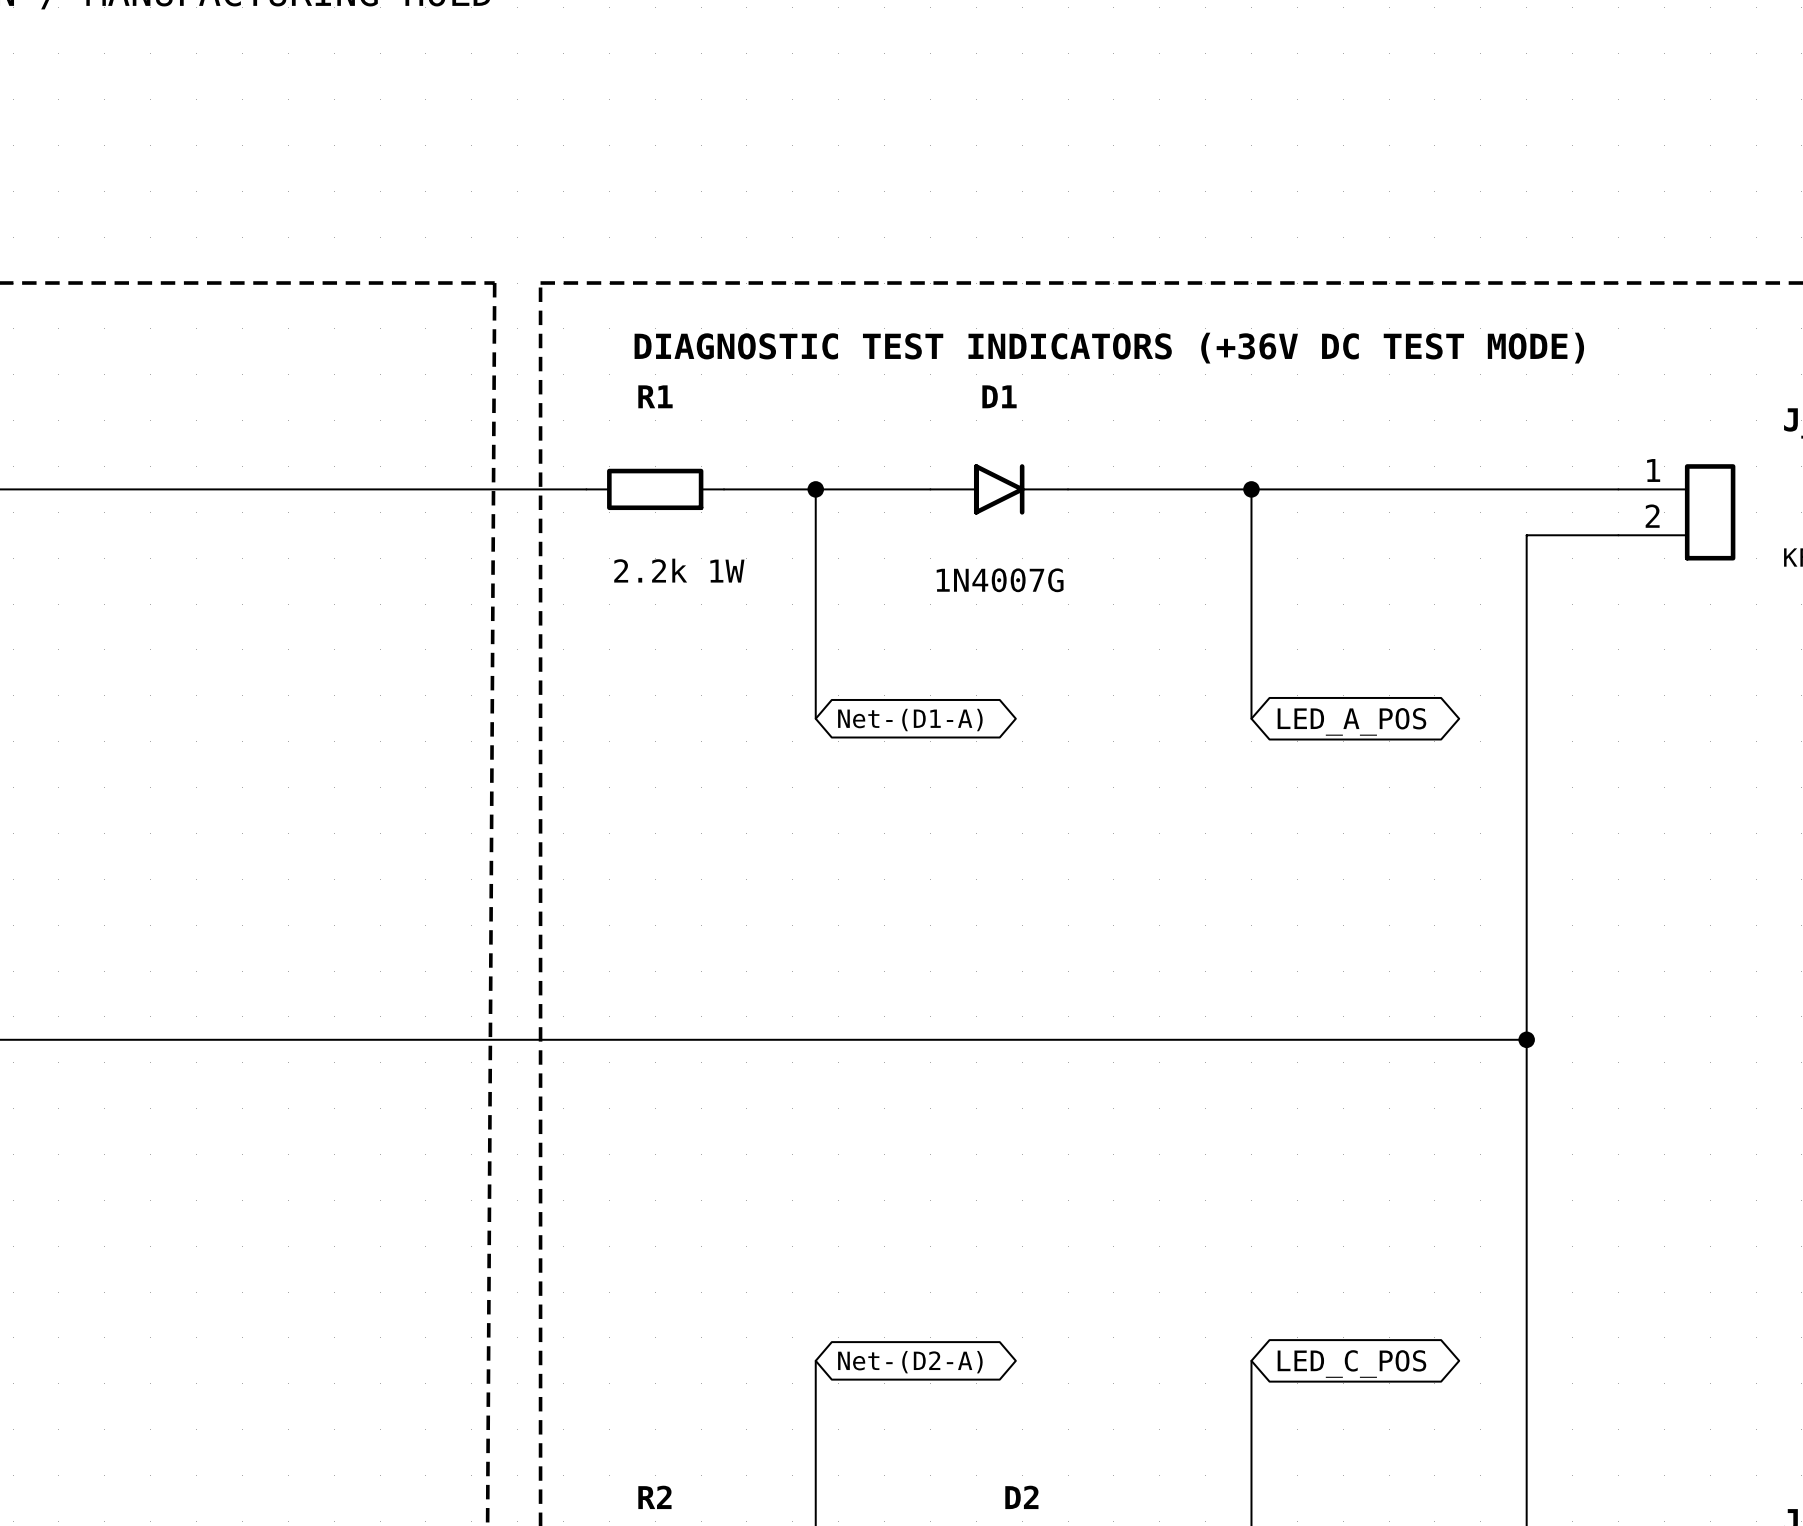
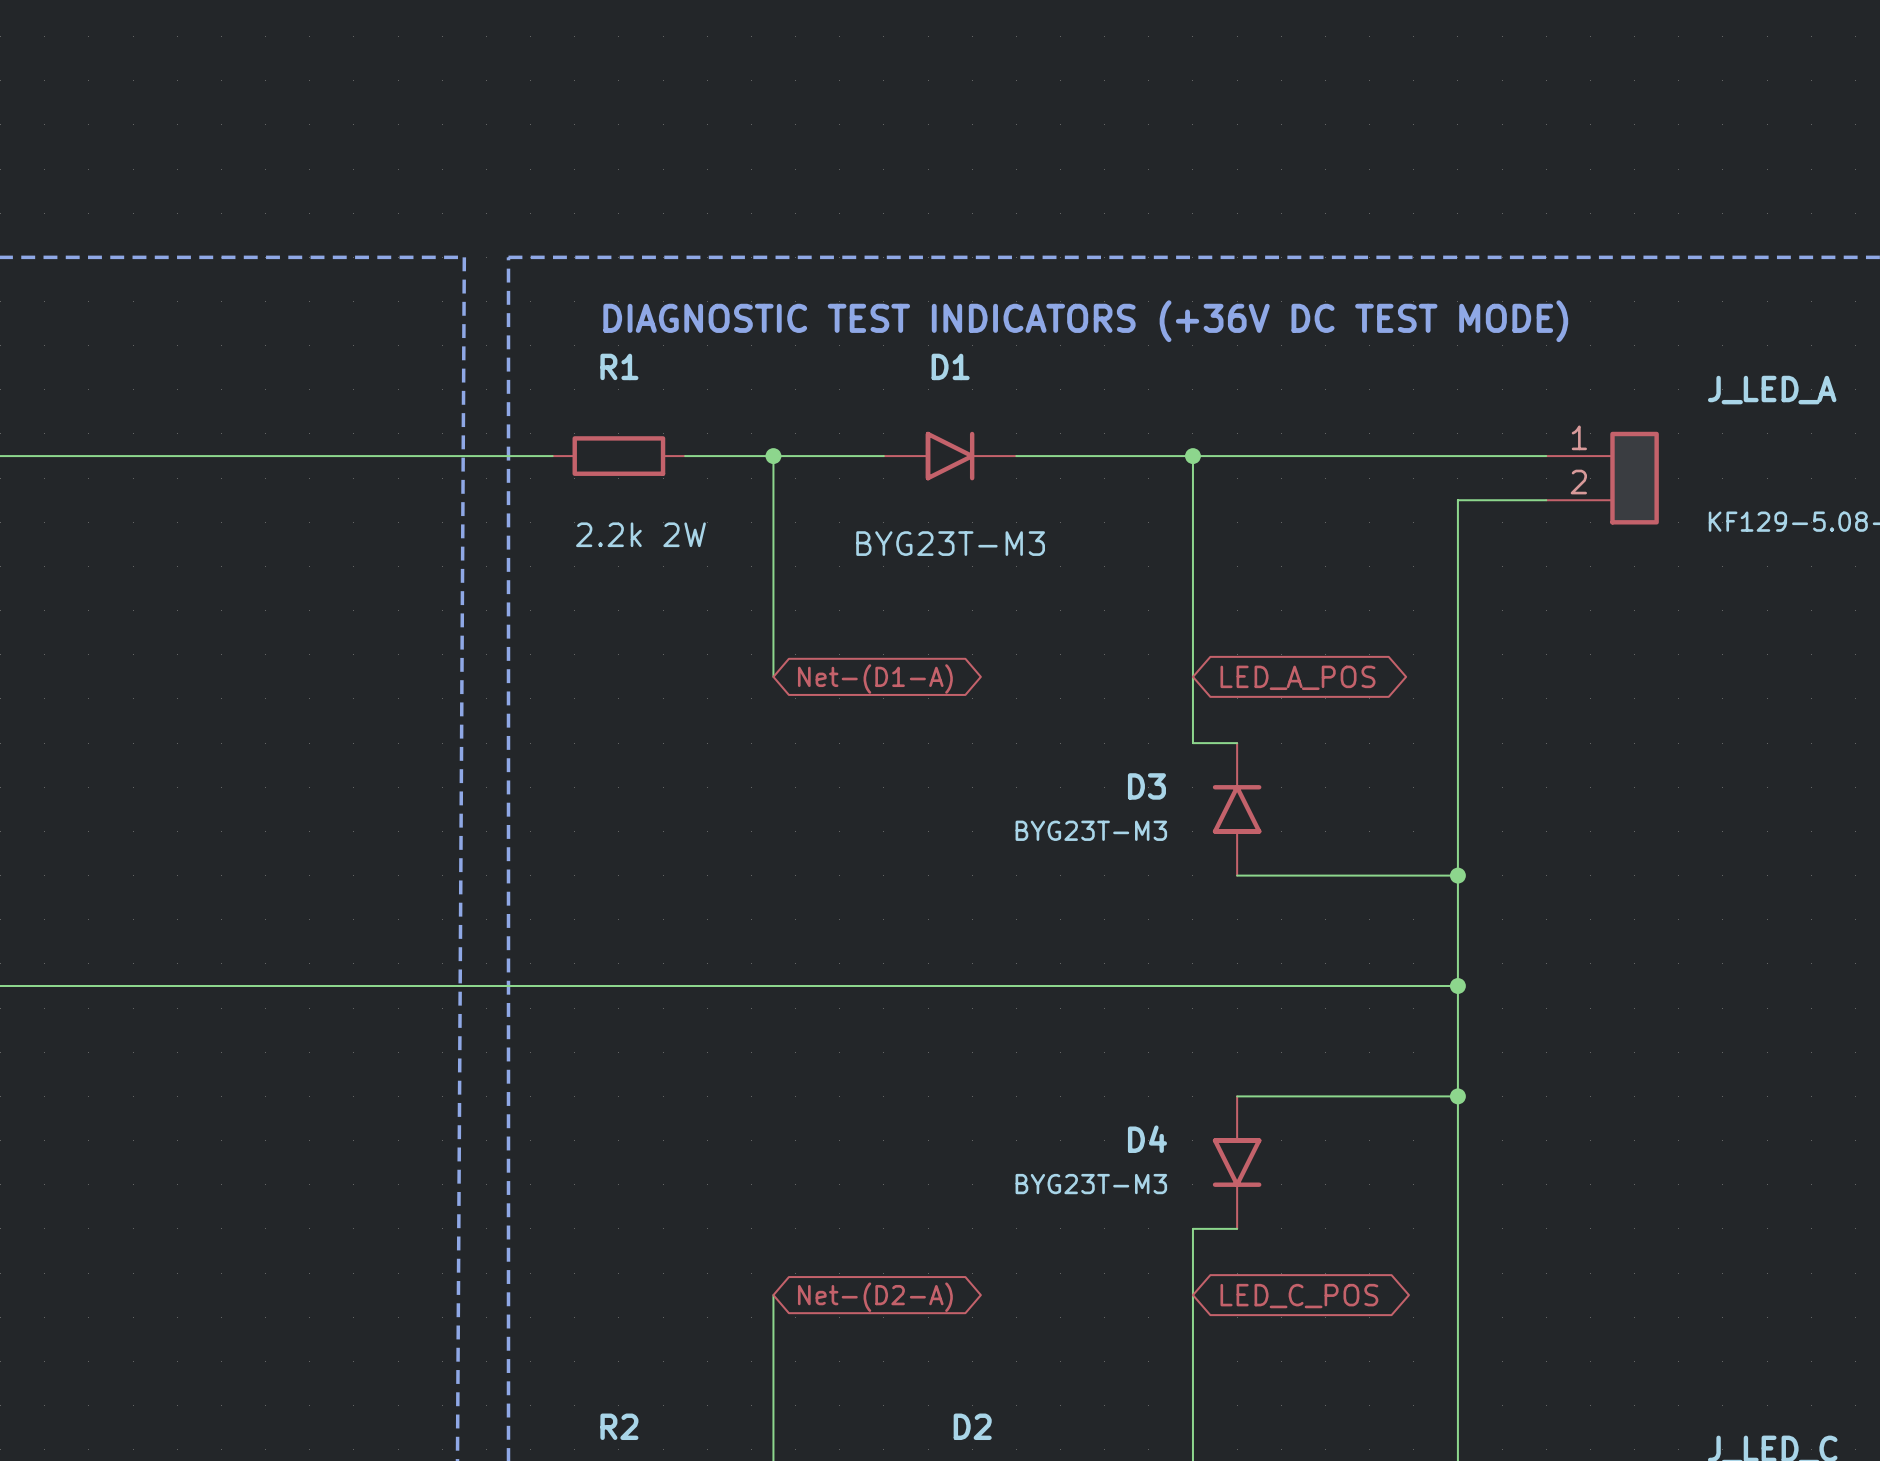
R1 value: 2.2k 1W (679, 570) -> 2.2k 2W (640, 534)
D1 value: 1N4007G (1000, 580) -> BYG23T-M3 (950, 543)
wire: none -> (1192, 676) (1192, 743) (1237, 743)
D3: none -> BYG23T-M3 (1237, 809)
wire: none -> (1237, 875) (1457, 875)
junction: none -> (1457, 875)
wire: none -> (1237, 1096) (1457, 1096)
junction: none -> (1457, 1096)
D4: none -> BYG23T-M3 (1237, 1162)
wire: none -> (1237, 1228) (1192, 1228) (1192, 1295)

